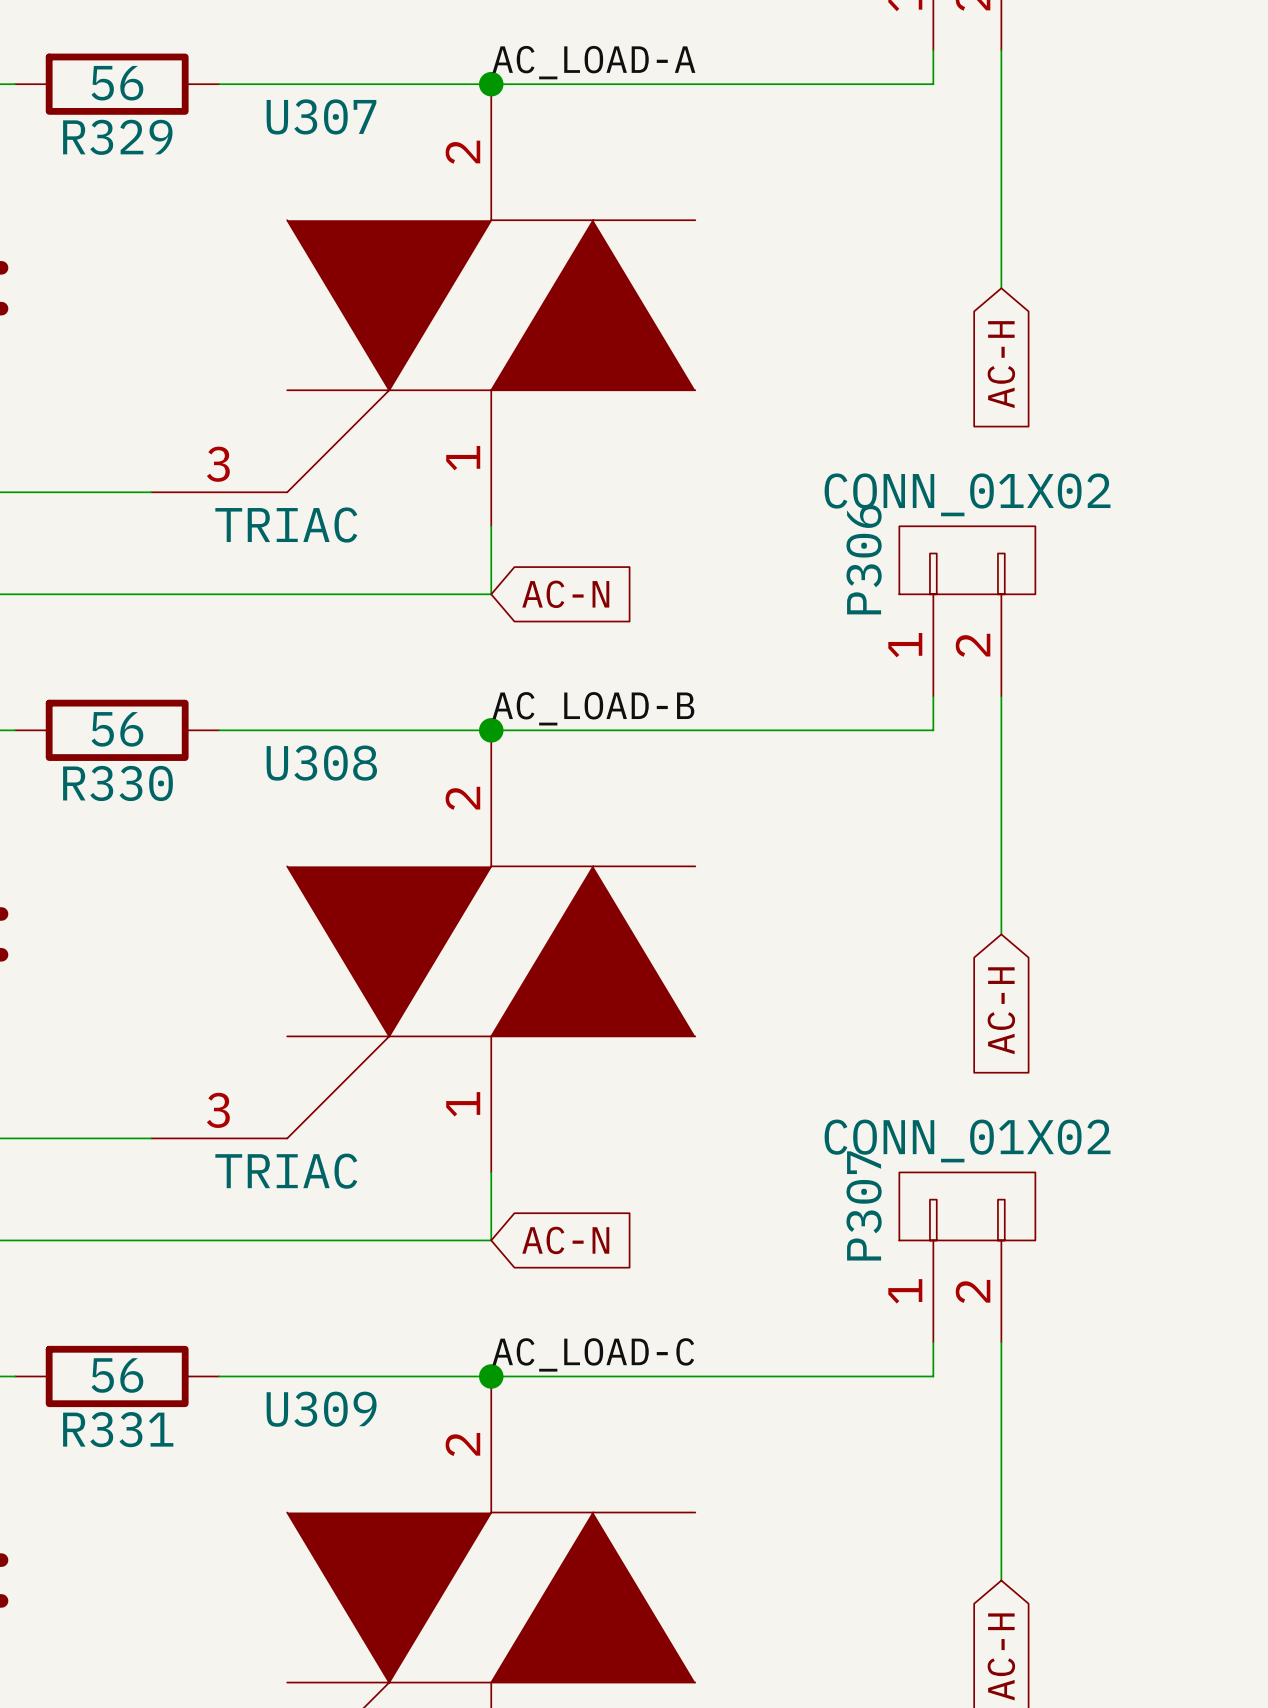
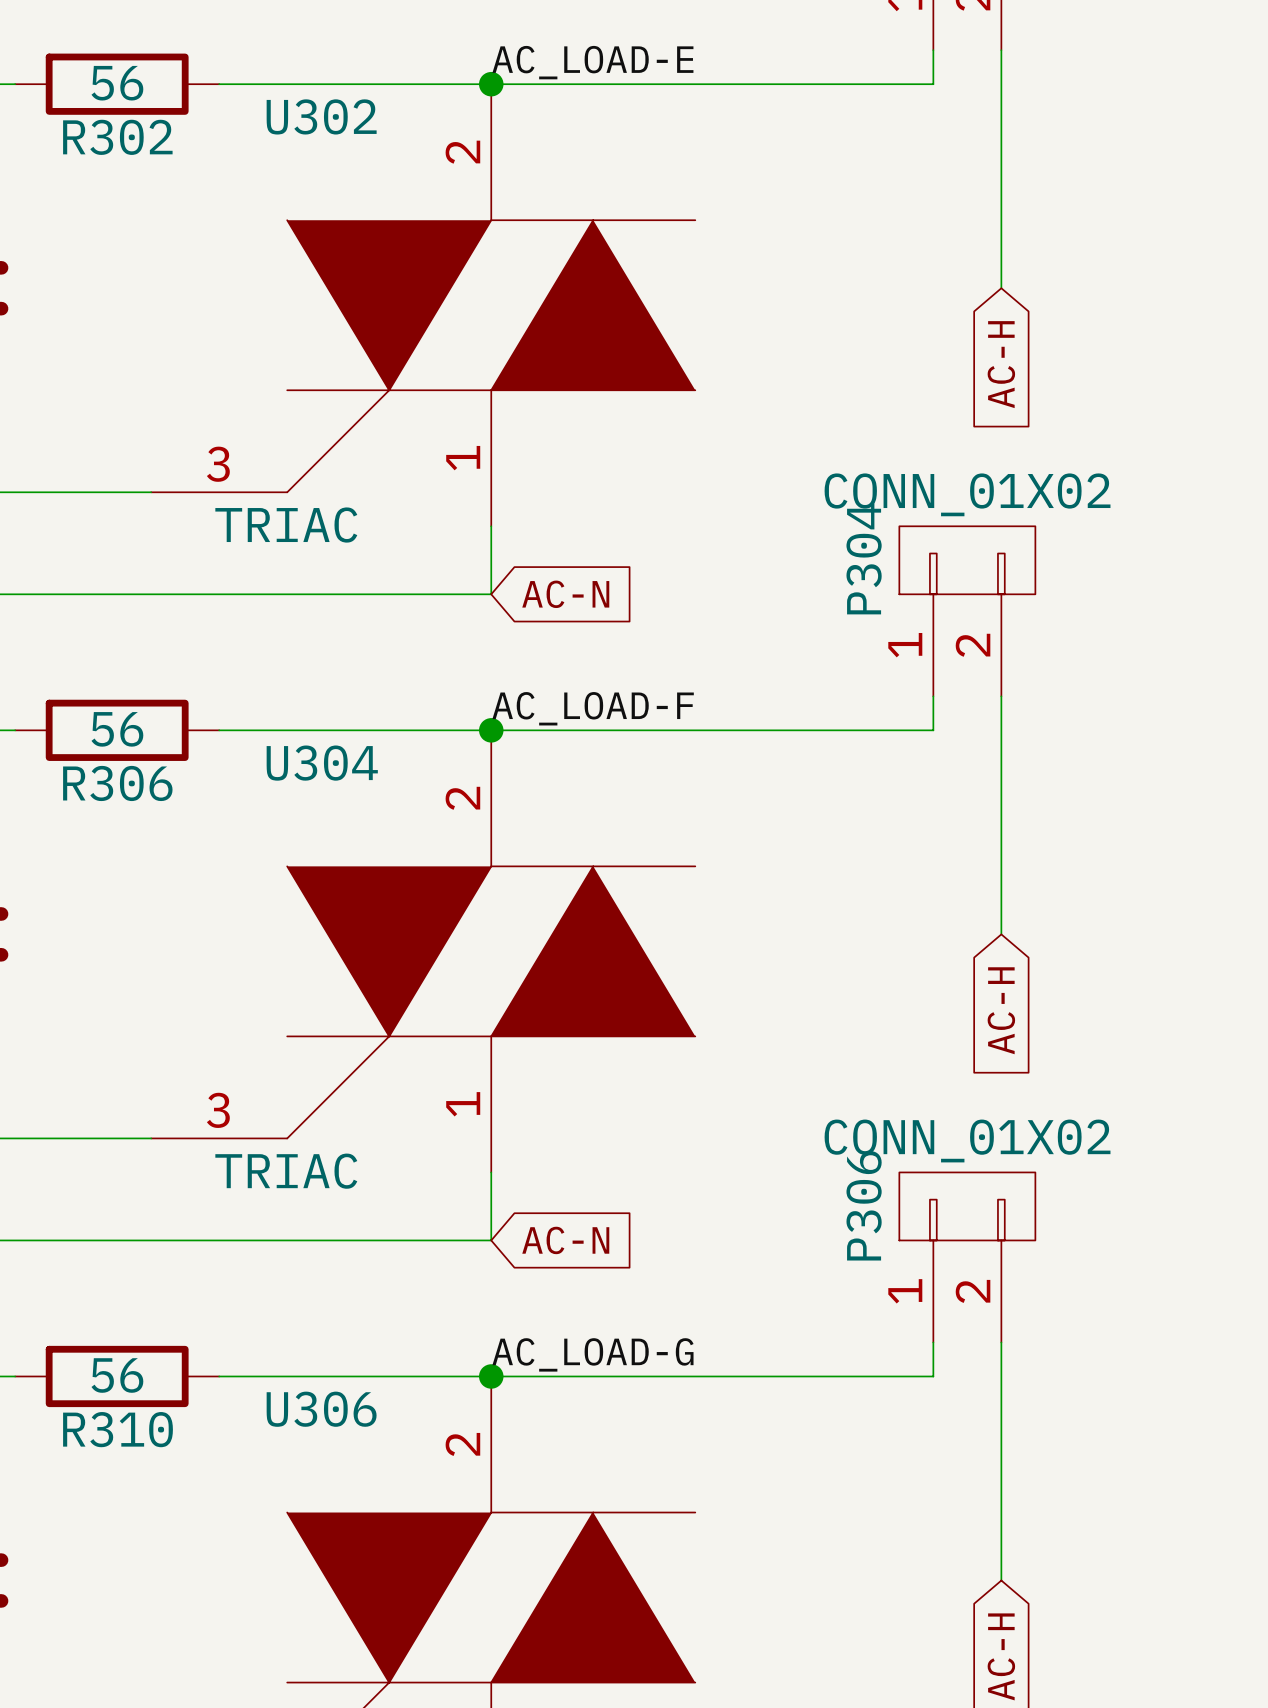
label: AC_LOAD-A (593, 62) -> AC_LOAD-E (592, 62)
U307 name: U307 (321, 116) -> U302 (321, 116)
R329 name: R329 (117, 137) -> R302 (117, 137)
P306 name: P306 (864, 559) -> P304 (864, 559)
label: AC_LOAD-B (593, 708) -> AC_LOAD-F (593, 708)
U308 name: U308 (321, 763) -> U304 (322, 763)
R330 name: R330 (118, 783) -> R306 (117, 783)
P307 name: P307 (864, 1205) -> P306 (864, 1205)
label: AC_LOAD-C (593, 1354) -> AC_LOAD-G (592, 1354)
U309 name: U309 (321, 1409) -> U306 (321, 1409)
R331 name: R331 (118, 1429) -> R310 (118, 1429)

